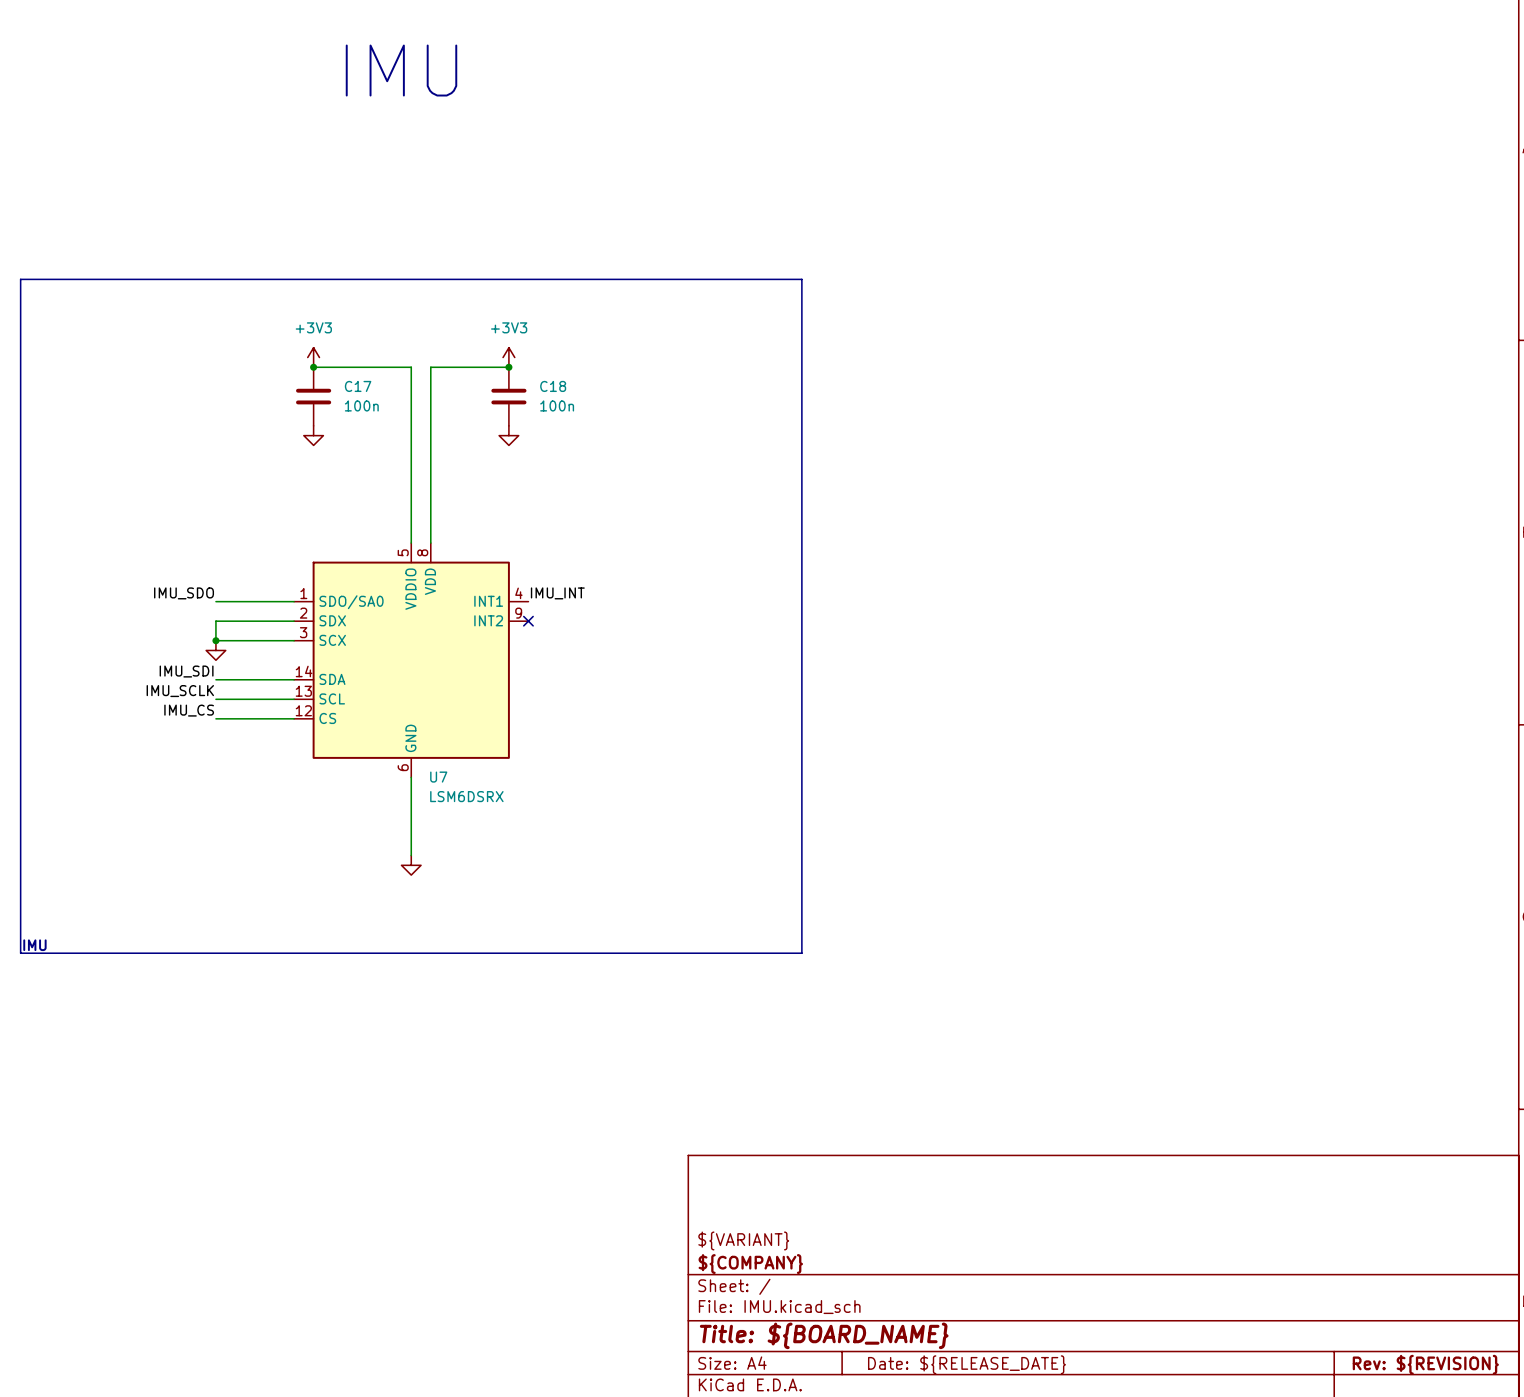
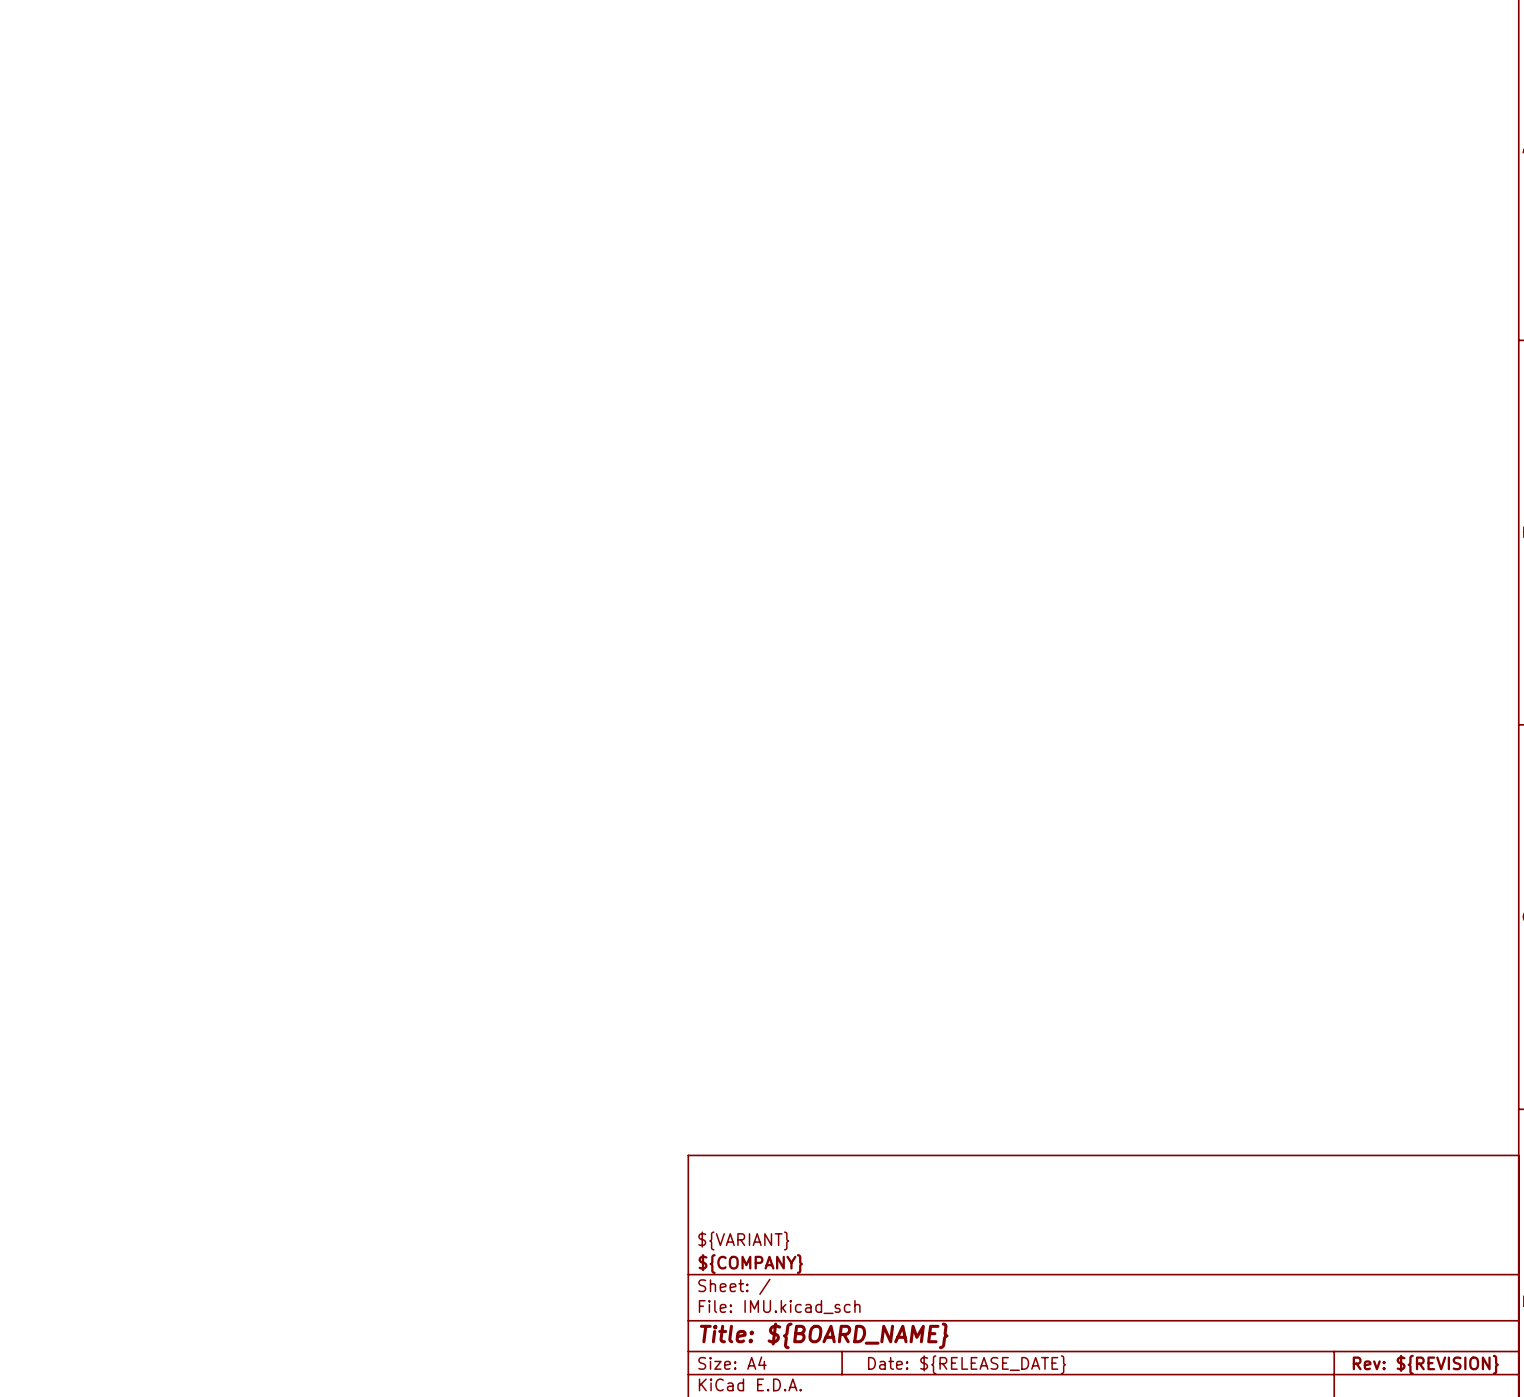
text: IMU (401, 70) -> none
line: (20, 279) (801, 279) (801, 953) (20, 953) (20, 279) -> none
power symbol: +3V3 (313, 357) -> none
power symbol: +3V3 (508, 357) -> none
wire: (313, 367) (411, 367) (411, 543) -> none
junction: (313, 367) -> none
wire: (508, 367) (430, 367) (430, 543) -> none
junction: (508, 367) -> none
C17: 100n (313, 396) -> none
C18: 100n (508, 396) -> none
power symbol: (313, 435) -> none
power symbol: (508, 435) -> none
label: IMU_SDO (184, 593) -> none
label: IMU_INT (557, 593) -> none
wire: (215, 601) (294, 601) -> none
wire: (294, 621) (215, 621) (215, 640) (294, 640) -> none
no-connect mark: (528, 621) -> none
junction: (215, 640) -> none
power symbol: (215, 650) -> none
U7: LSM6DSRX (411, 660) -> none
label: IMU_SDI (186, 671) -> none
wire: (215, 679) (294, 679) -> none
label: IMU_SCLK (180, 691) -> none
wire: (215, 699) (294, 699) -> none
label: IMU_CS (189, 710) -> none
wire: (215, 718) (294, 718) -> none
wire: (411, 777) (411, 855) -> none
power symbol: (411, 865) -> none
text: IMU (34, 945) -> none

